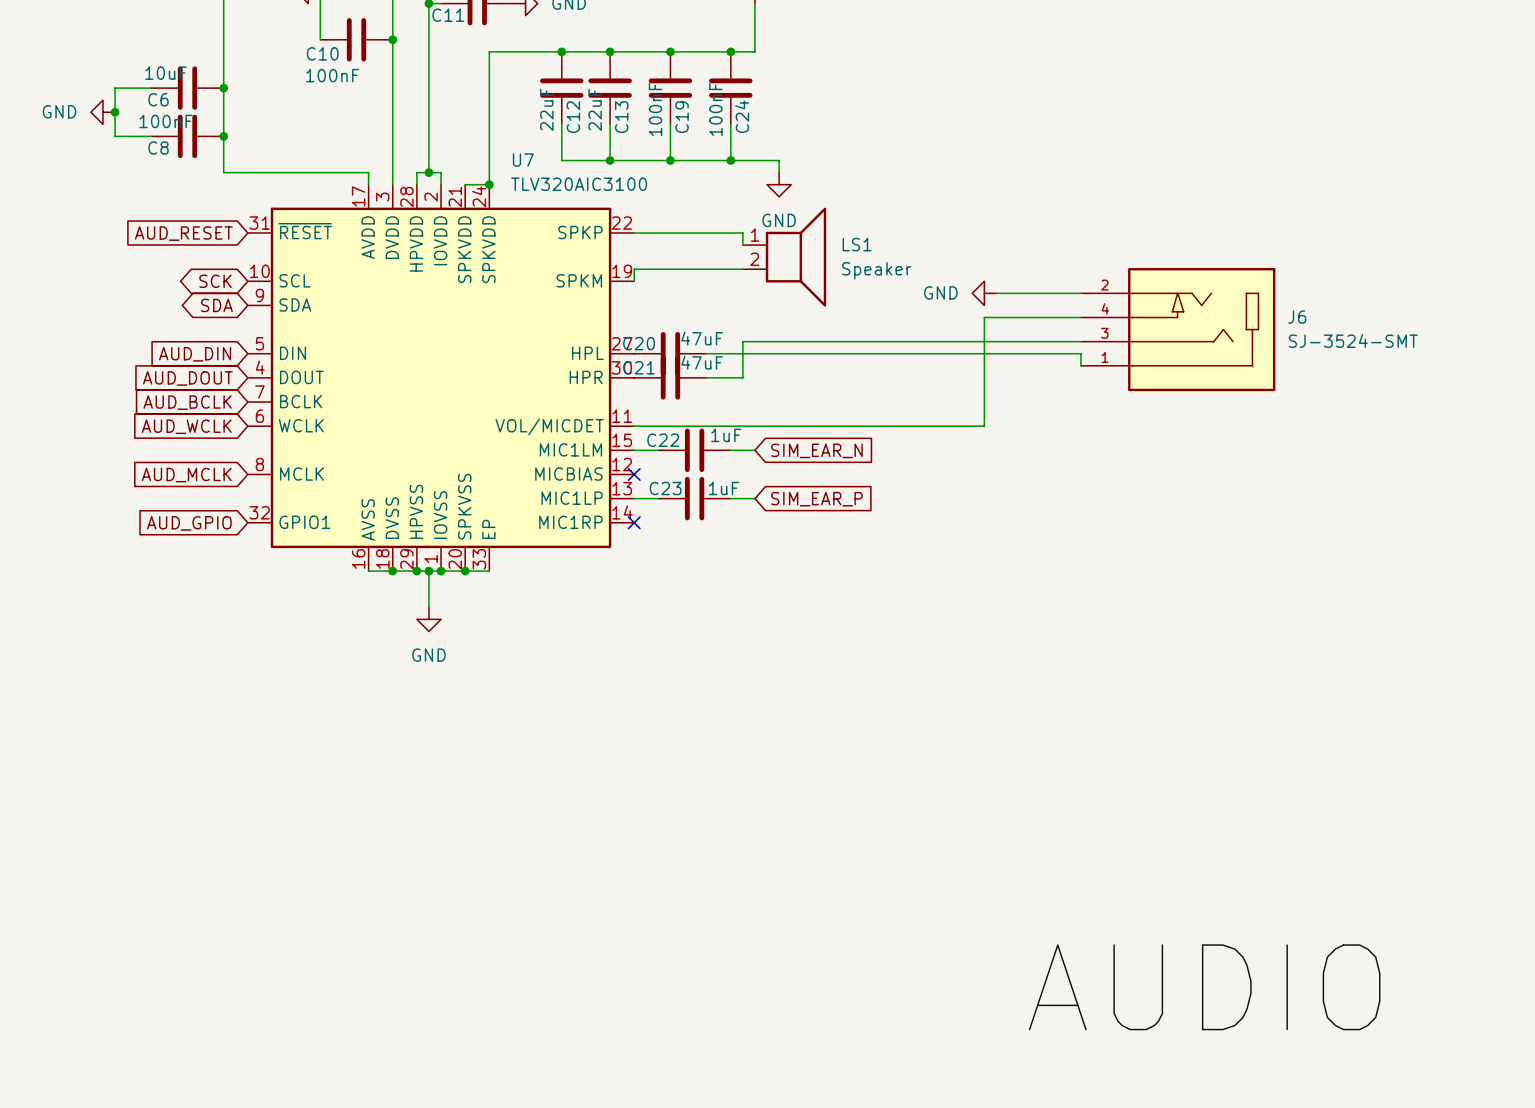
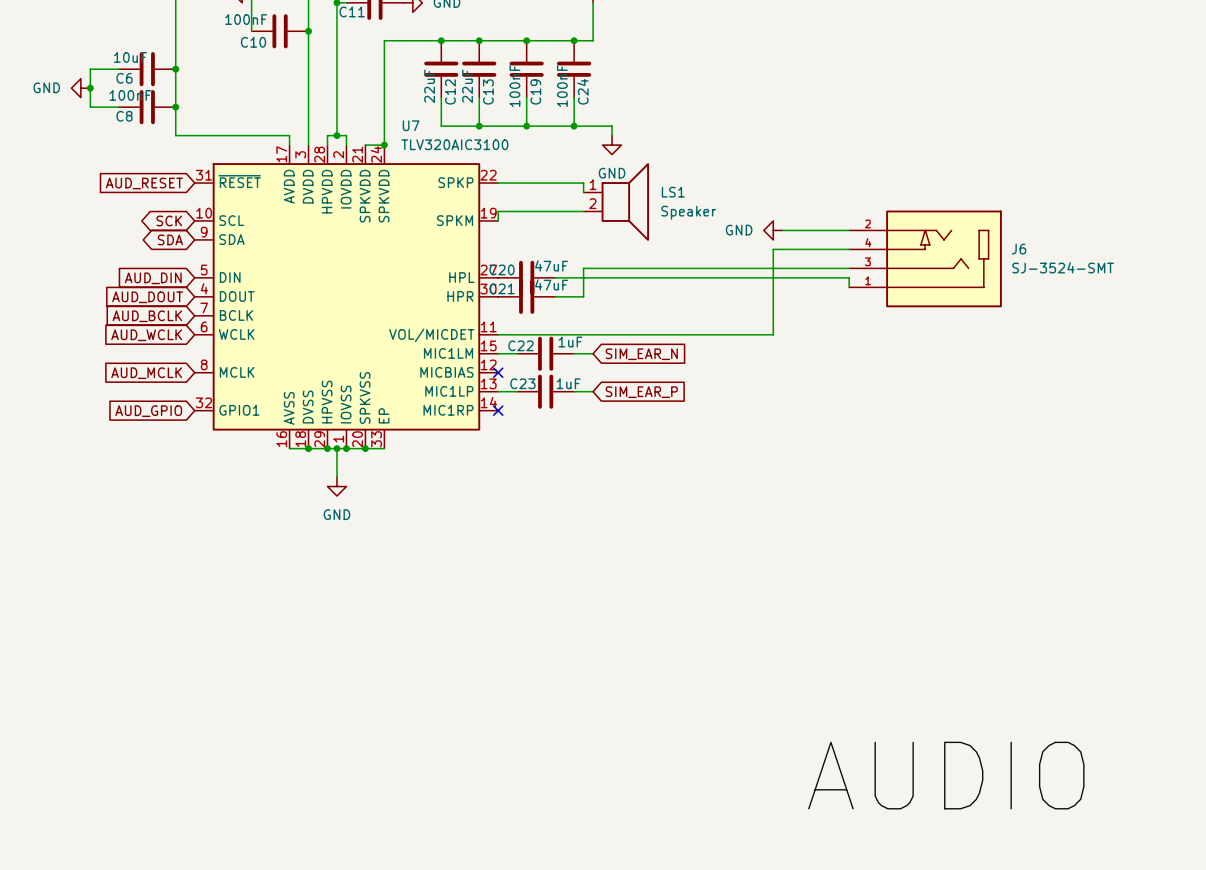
C10 value position: 100nF (332, 75) -> 100nF (246, 19)

